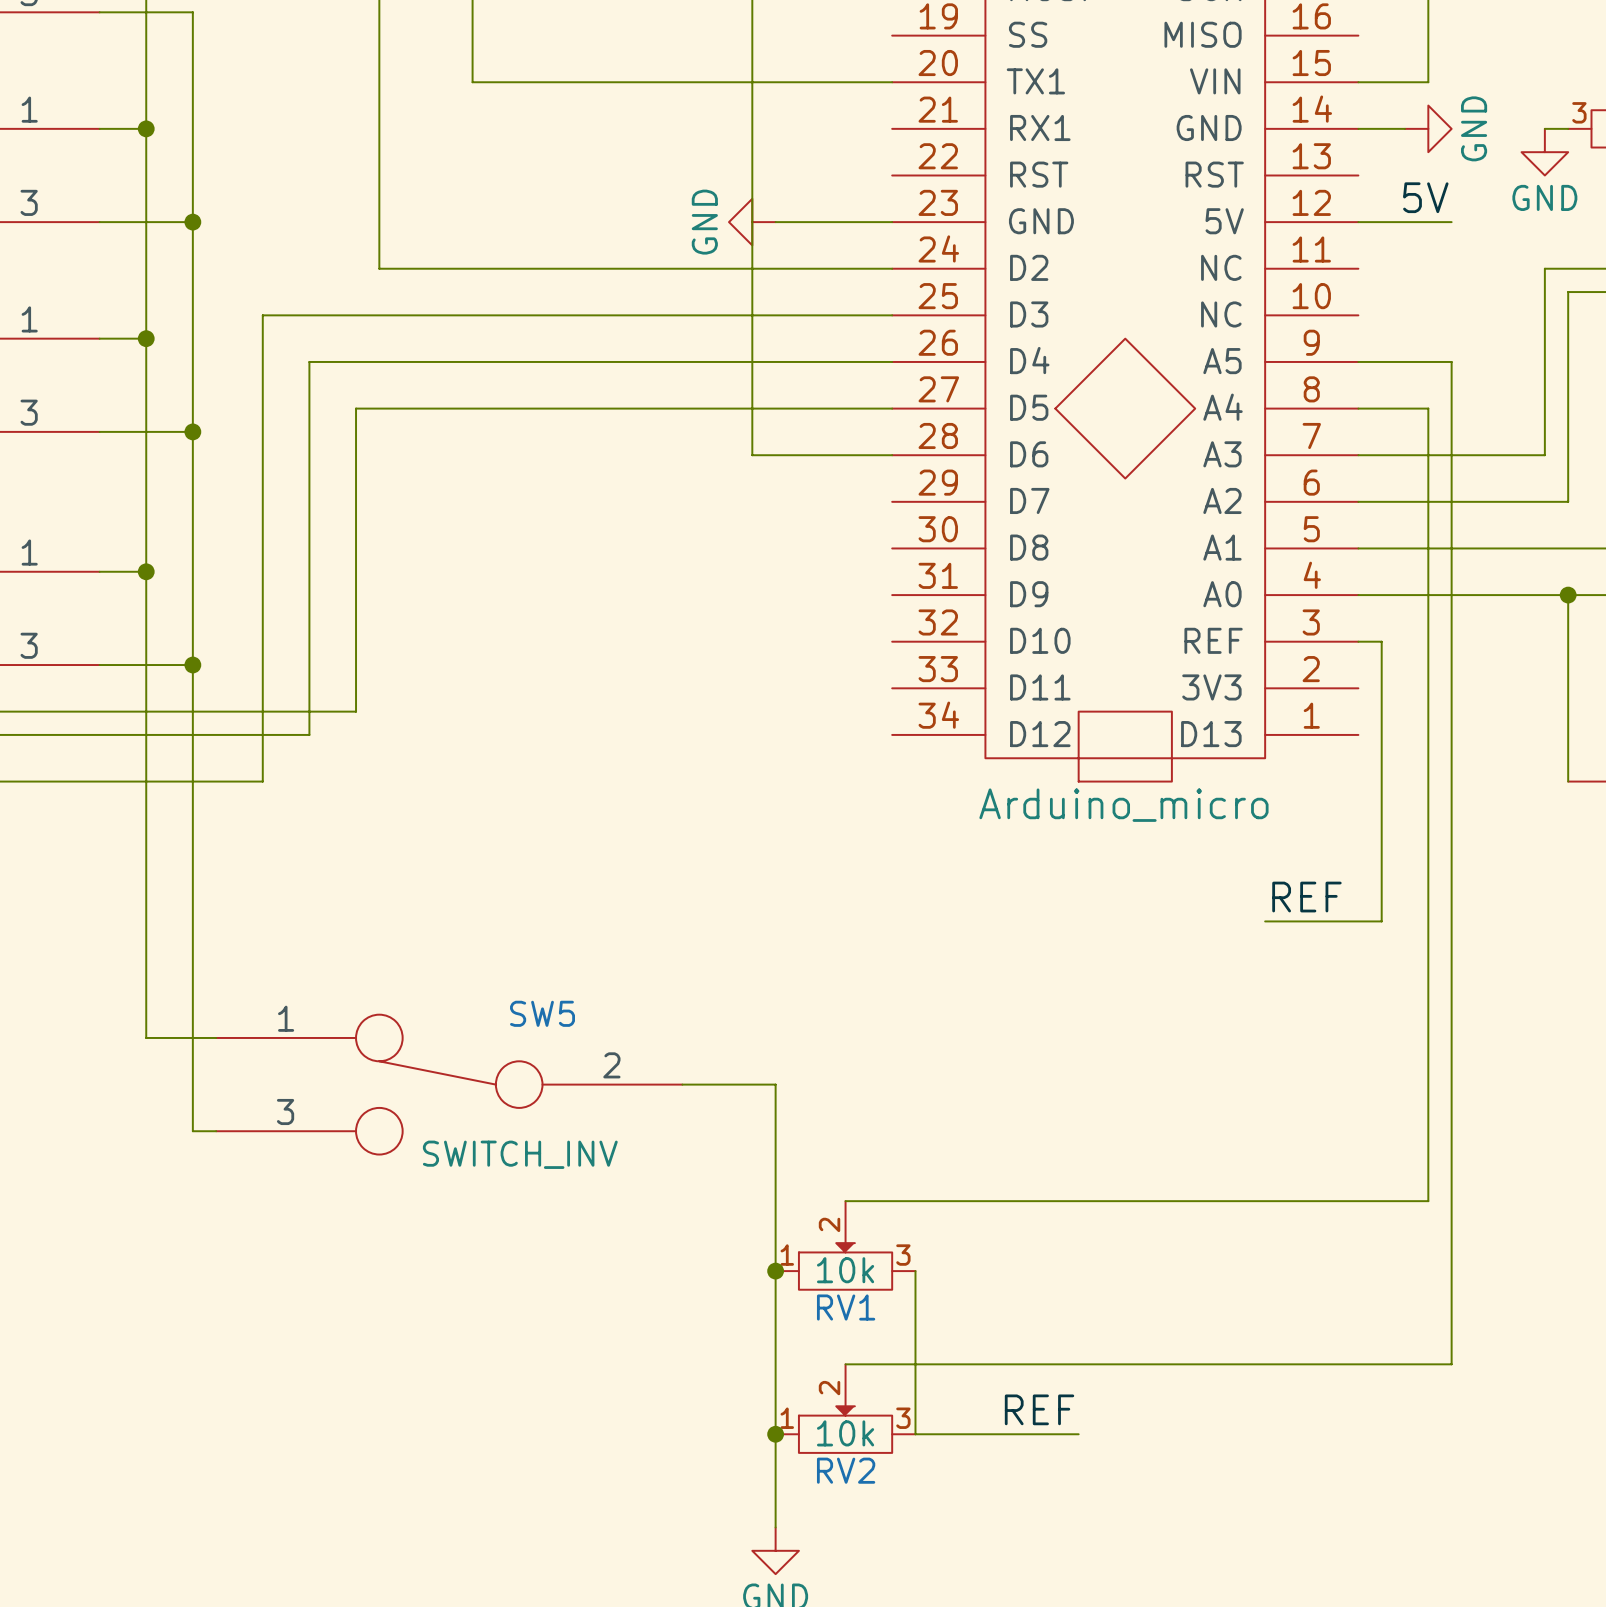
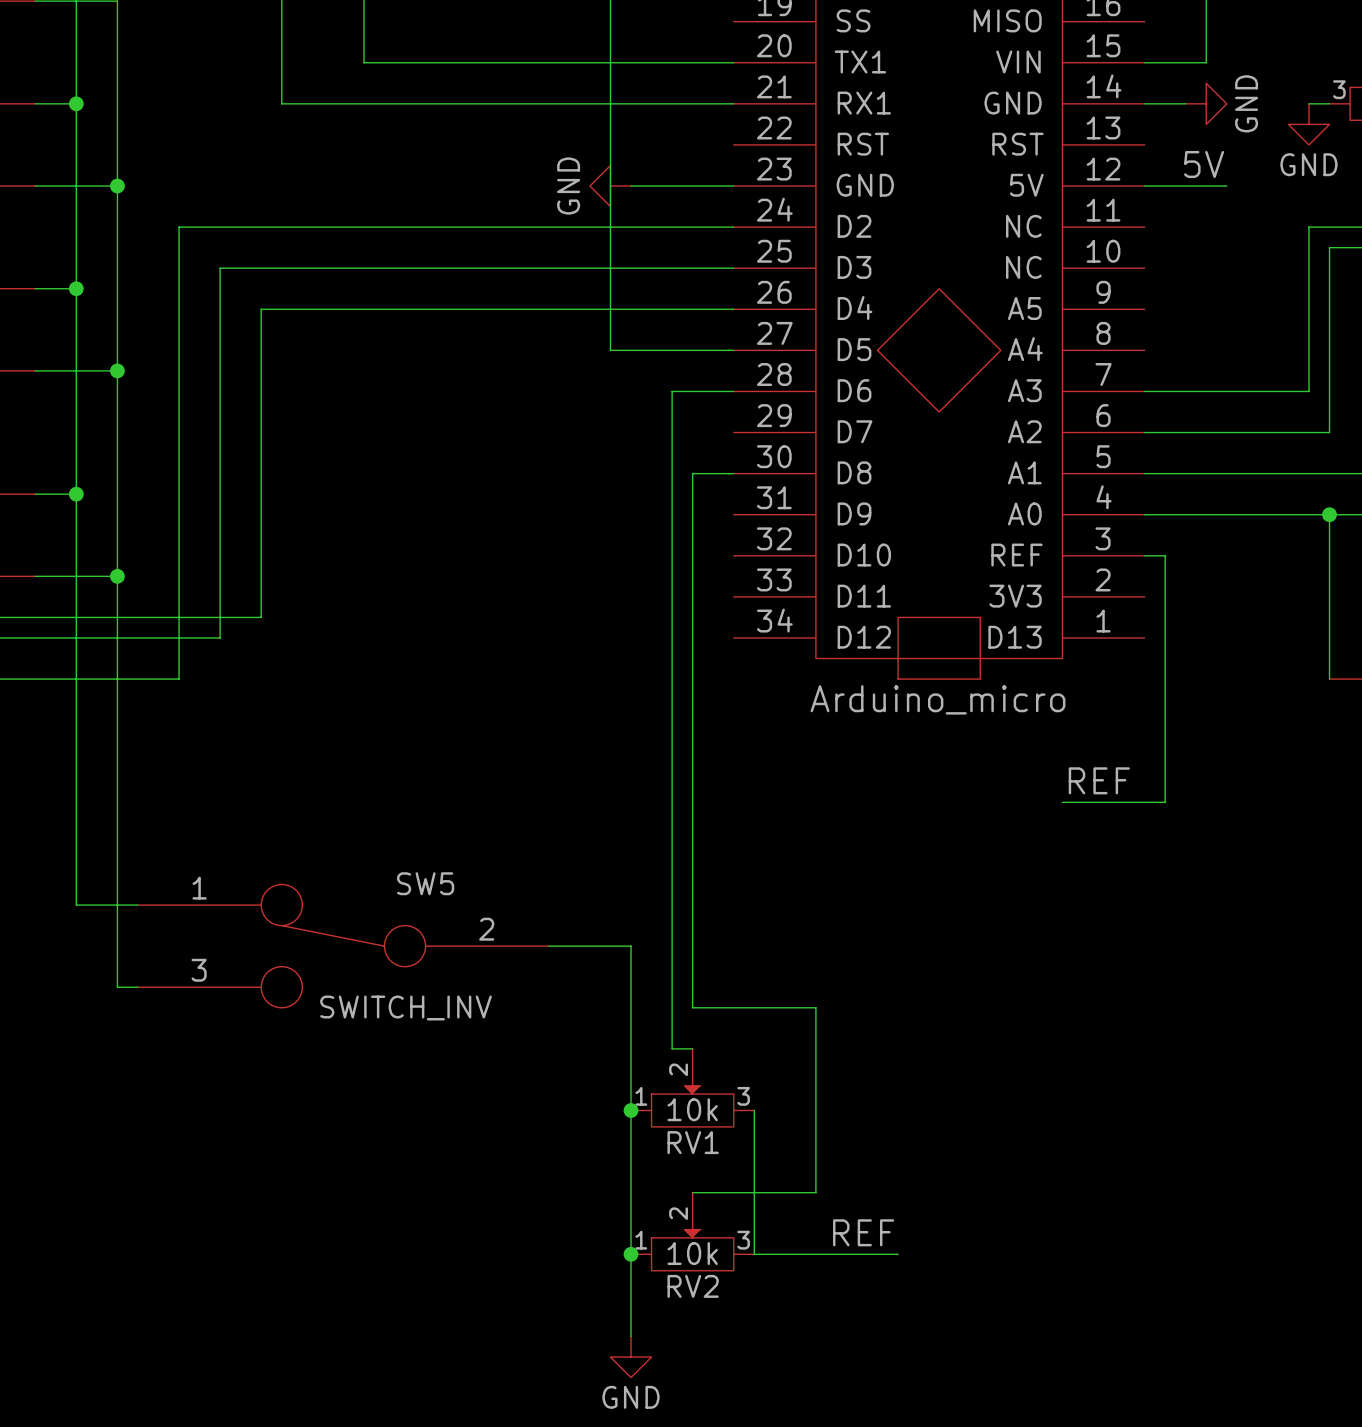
wire: (379, 128) (379, 268) -> (179, 268) (179, 227) (281, 227)
wire: none -> (281, 103) (733, 103)
wire: (262, 315) (309, 315) -> (220, 309) (220, 268)
wire: (309, 361) (356, 361) -> (261, 350) (261, 309)
wire: (1358, 361) (1451, 361) (1451, 1364) (985, 1364) -> (733, 473) (692, 473) (692, 1007) (815, 1007) (815, 1192)
wire: (356, 408) (752, 408) (752, 455) (822, 455) -> none
wire: (1358, 408) (1428, 408) (1428, 1201) (845, 1201) -> (672, 391) (672, 1048) (692, 1048)

